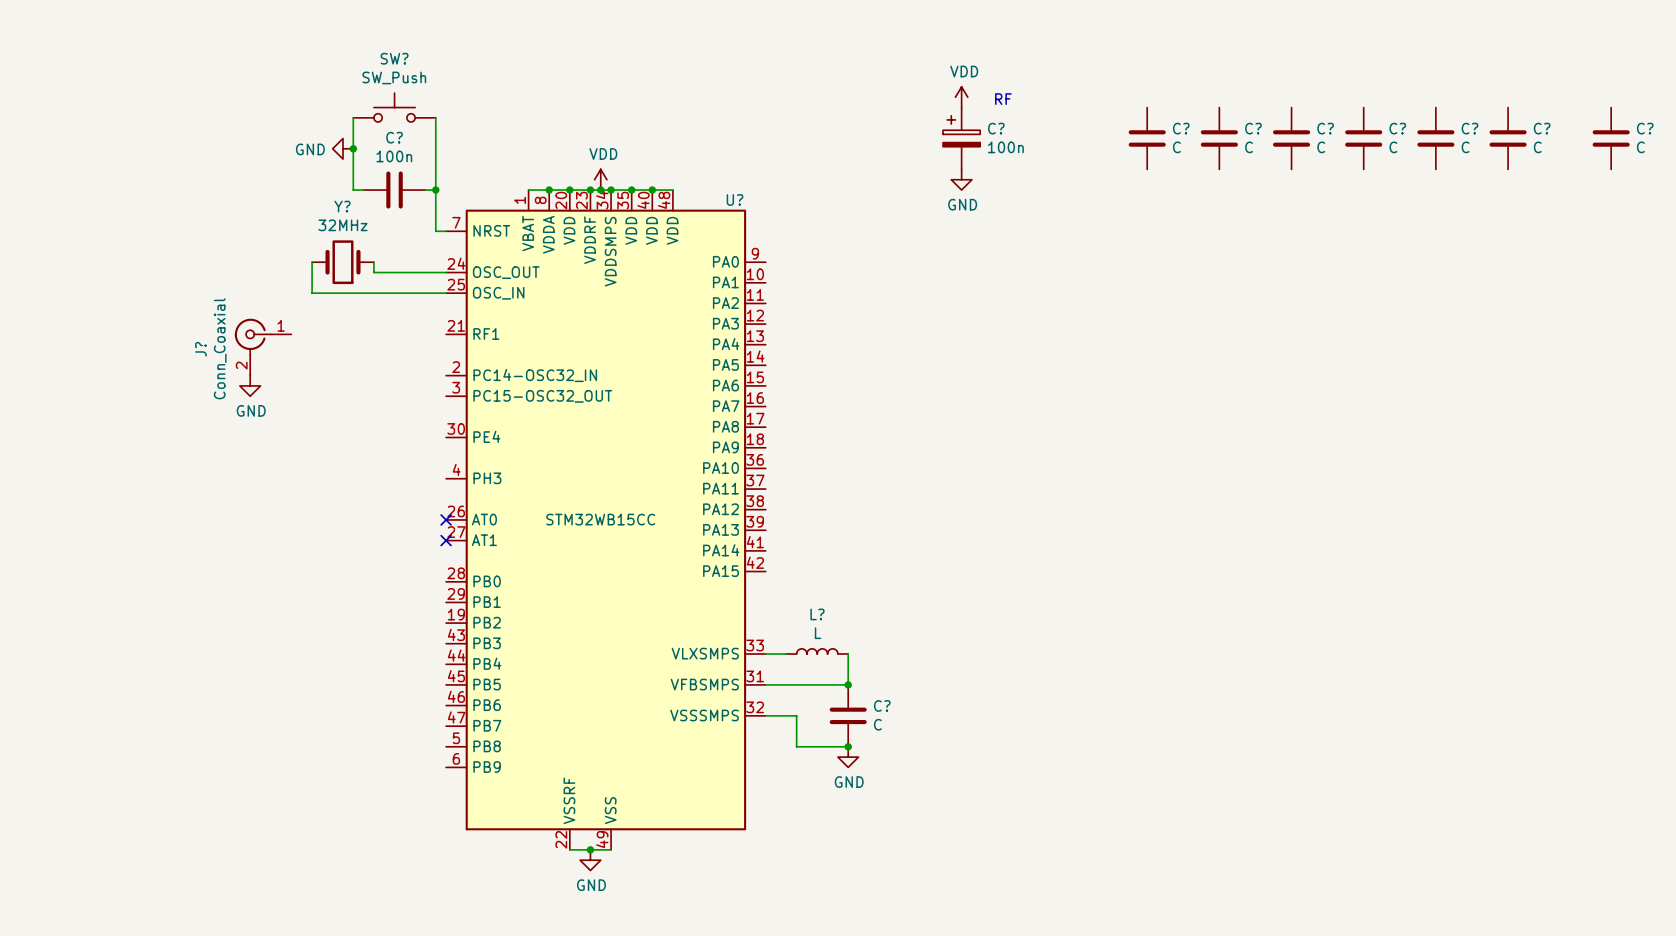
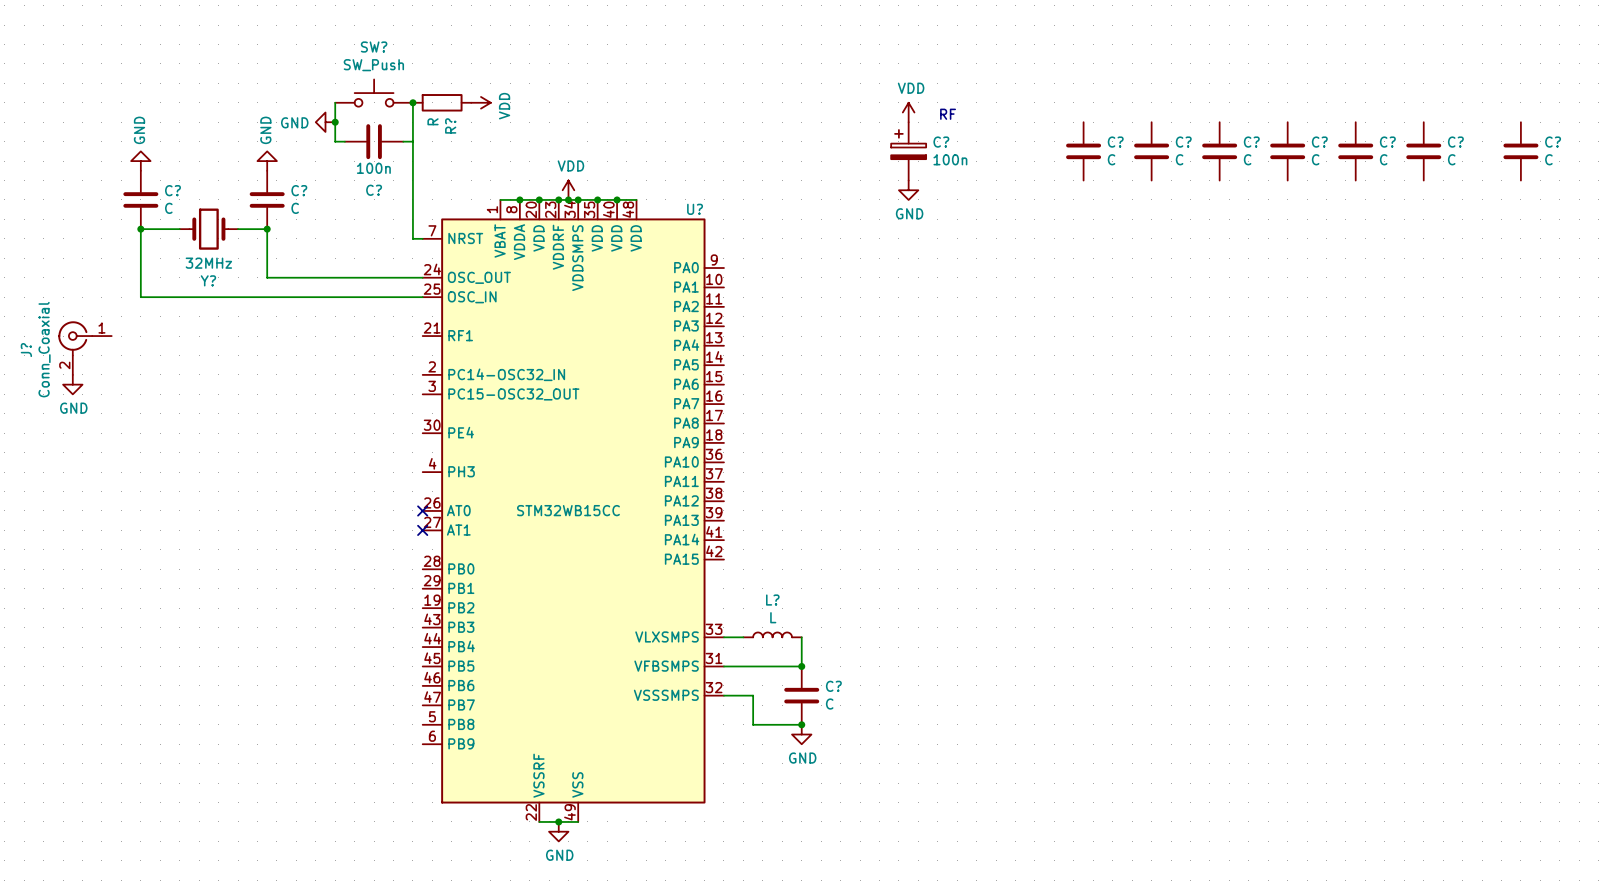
wire: none -> (335, 102) (335, 131)
wire: none -> (412, 102) (412, 131)
junction: none -> (412, 102)
R?: none -> R (442, 102)
power symbol: none -> VDD (481, 102)
power symbol: none -> GND (325, 122)
SW? position: (394, 107) -> (374, 93)
wire: (353, 128) (353, 190) (363, 190) -> (335, 141) (344, 141)
C? name position: C? (394, 137) -> C? (374, 190)
power symbol: none -> GND (140, 161)
power symbol: none -> GND (267, 161)
power symbol: GND (342, 148) -> none
junction position: (353, 148) -> (335, 122)
C?: none -> C (140, 199)
C?: none -> C (267, 199)
C? position: (394, 190) -> (374, 141)
wire: (425, 190) (435, 190) -> (403, 141) (412, 141)
junction: (435, 190) -> none
Y? name position: Y? (342, 206) -> Y? (208, 280)
junction: none -> (140, 229)
junction: none -> (267, 229)
Y? value position: 32MHz (342, 225) -> 32MHz (208, 263)
wire: (312, 262) (312, 293) -> (179, 229) (140, 229) (140, 297) (296, 297)
Y? position: (342, 262) -> (208, 229)
wire: (373, 262) (373, 272) -> (238, 229) (267, 229) (267, 277) (354, 277)
J? position: (263, 347) -> (84, 348)
power symbol: none -> GND (72, 384)
power symbol: GND (250, 385) -> none

